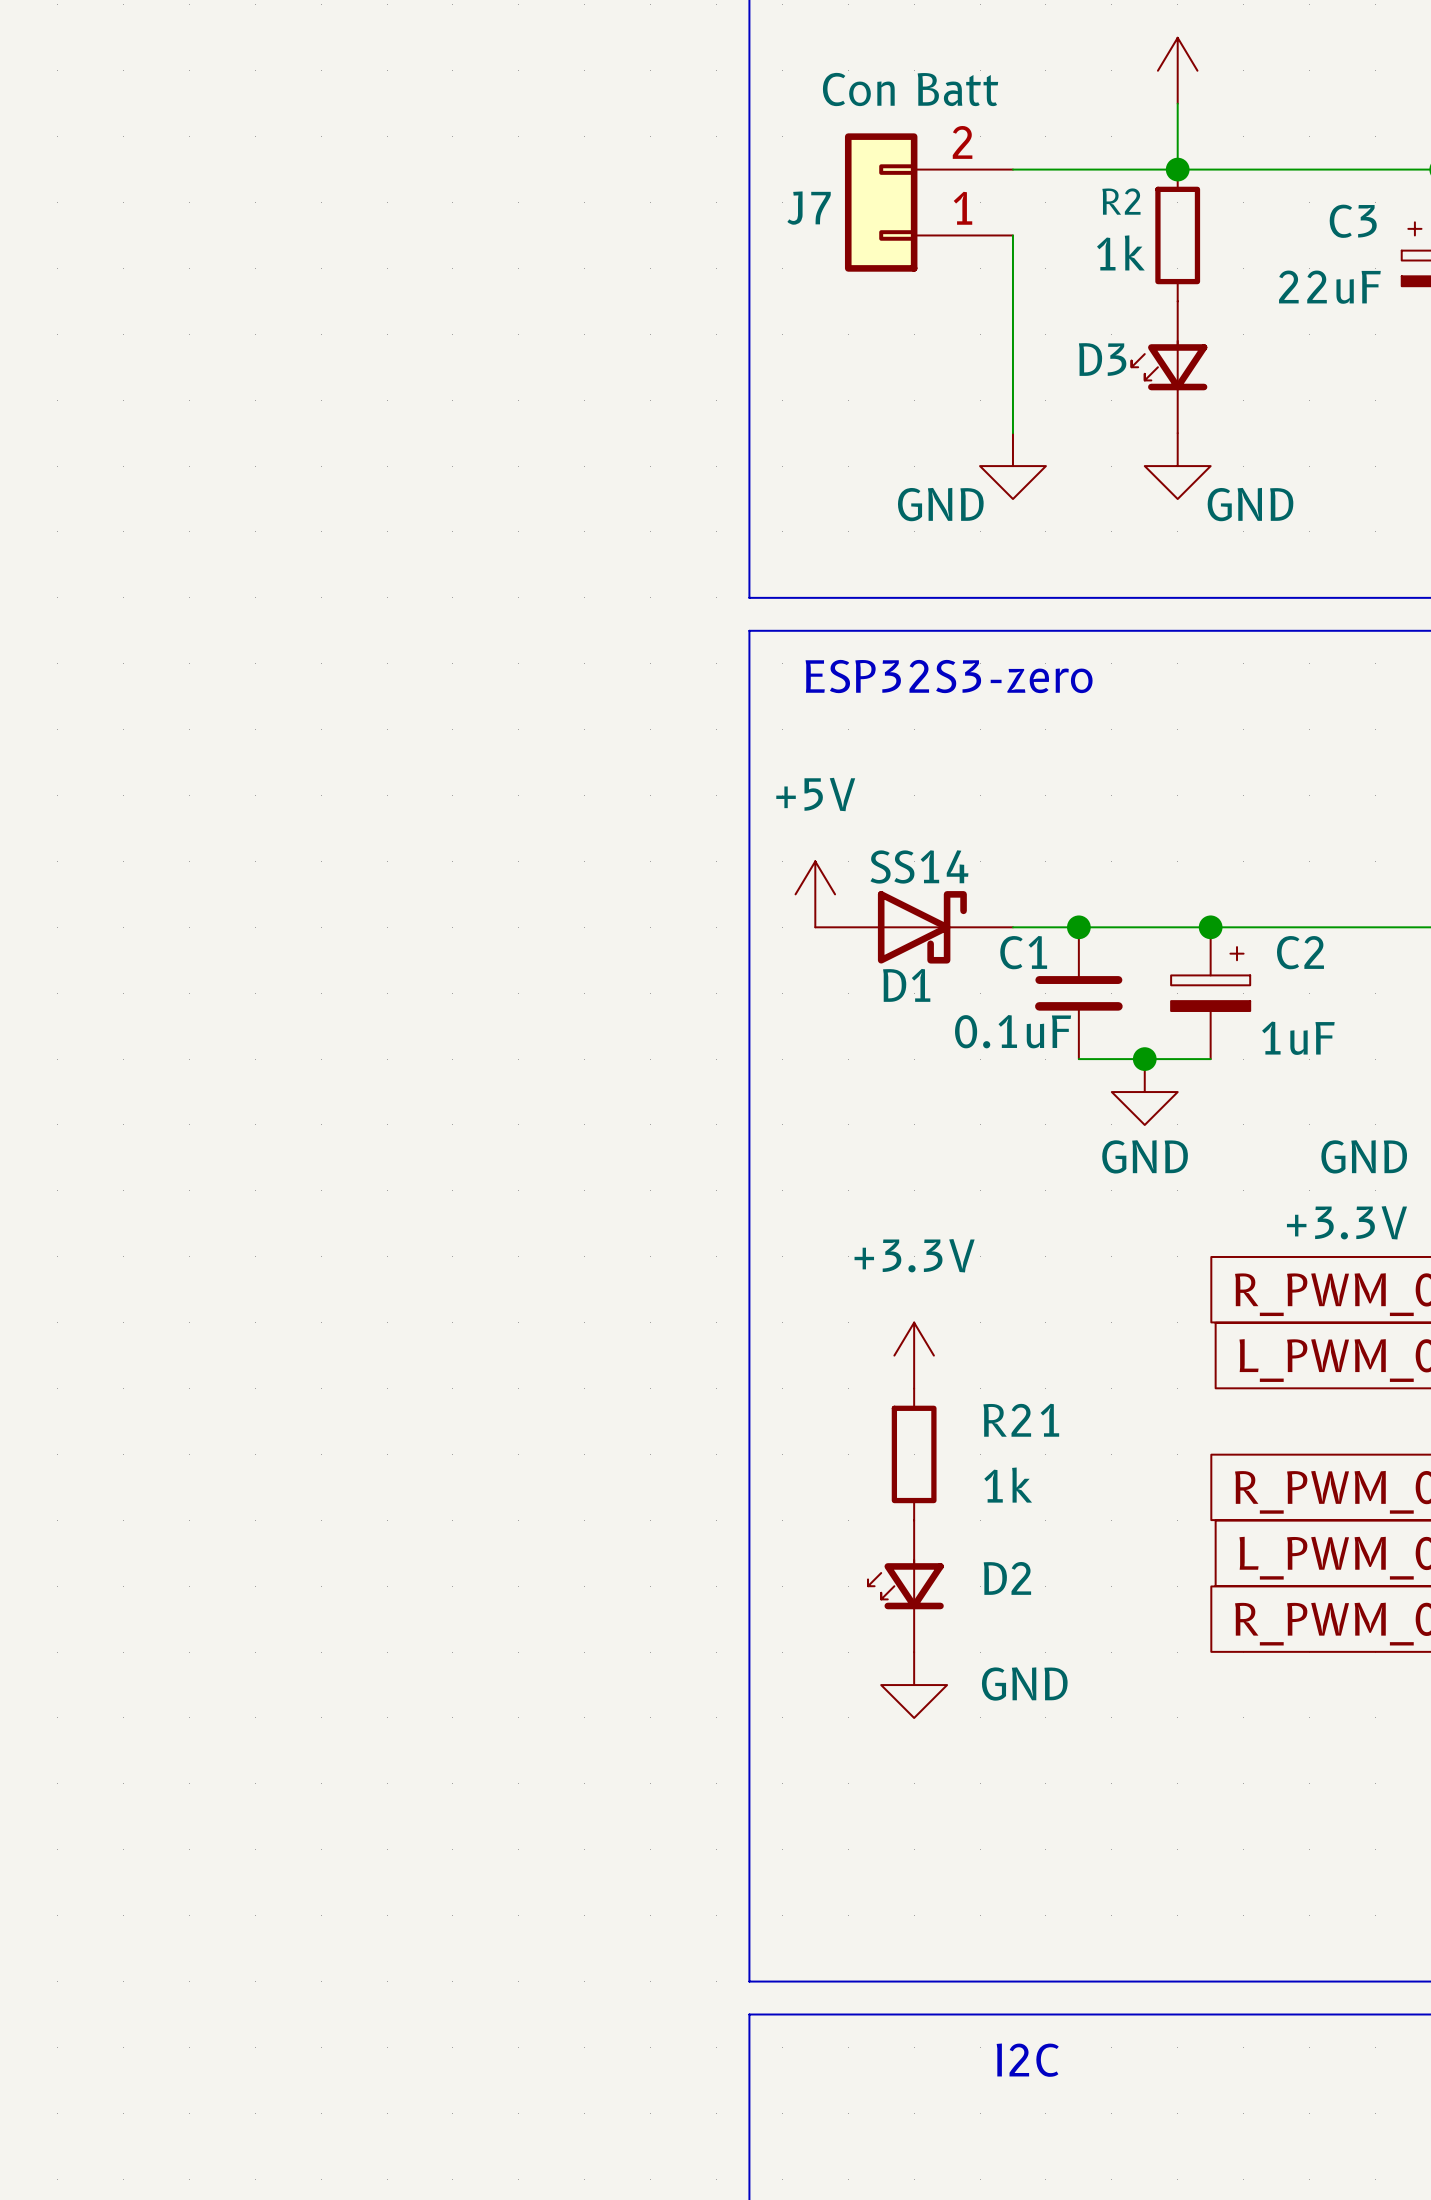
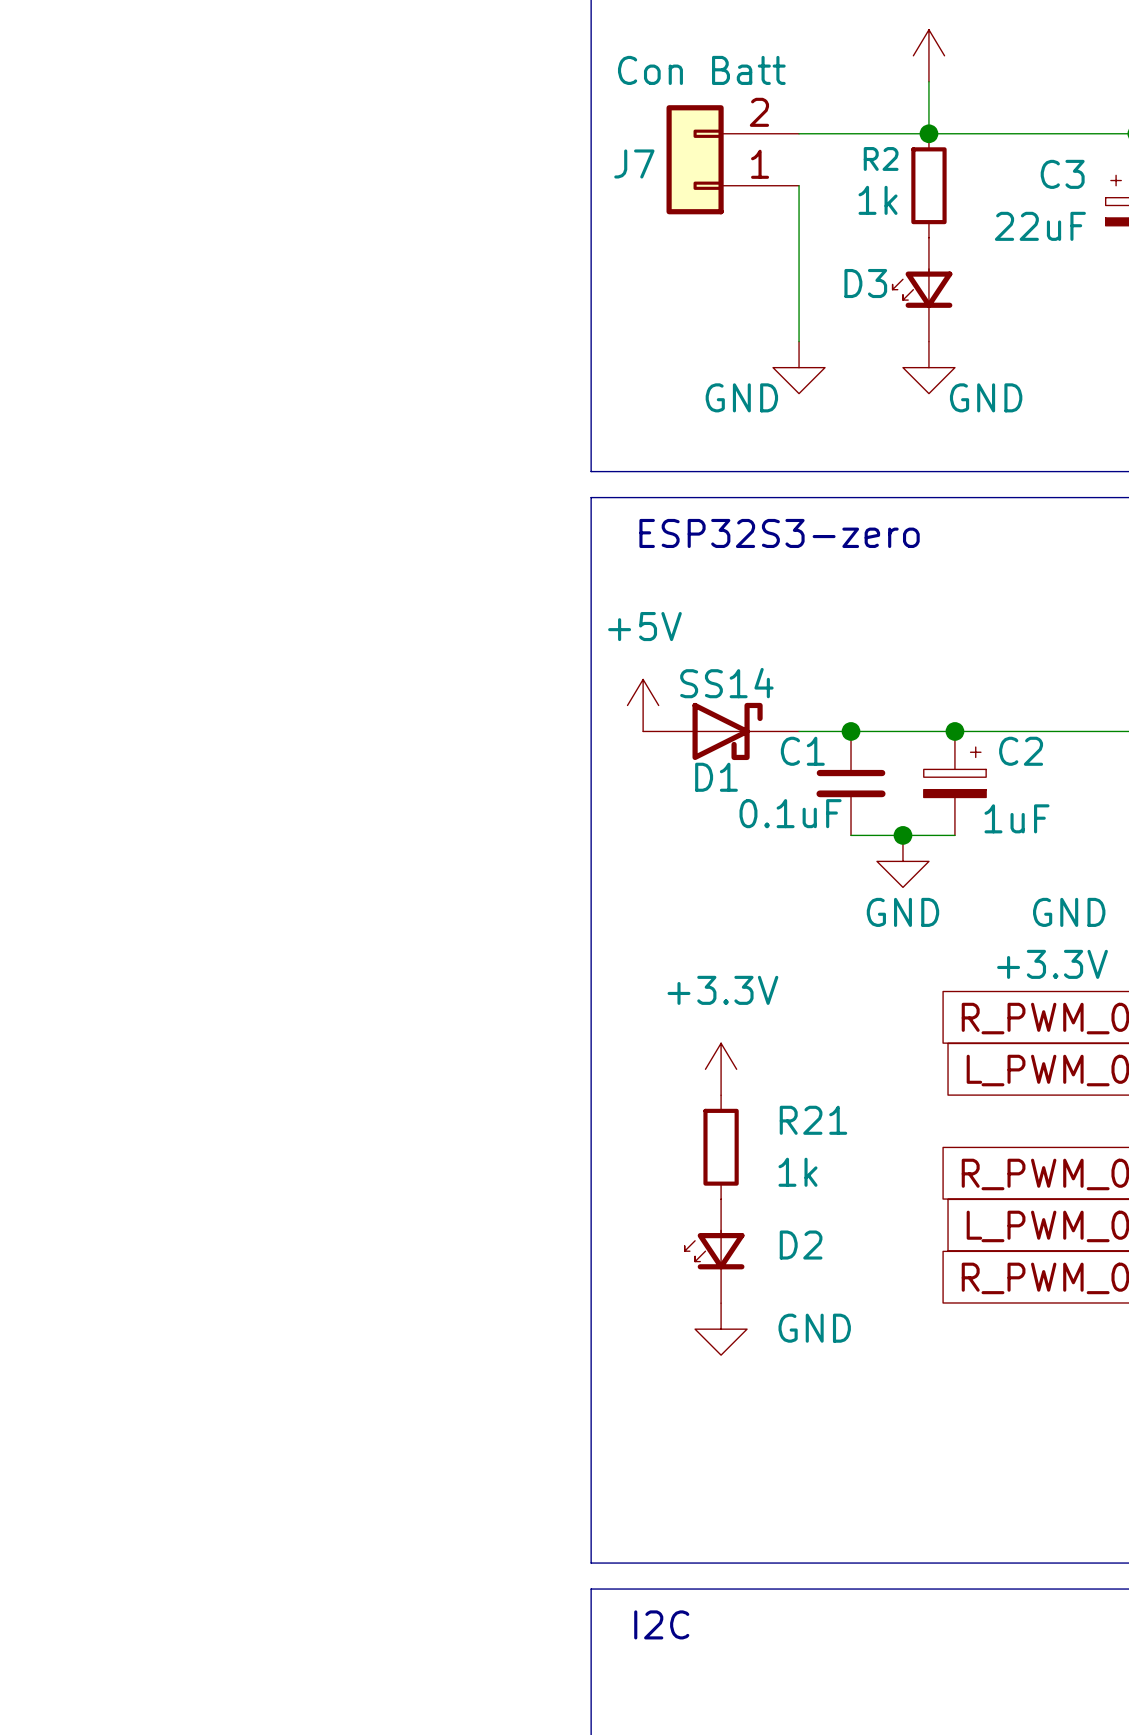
text position: I2C (1027, 2060) -> I2C (661, 1624)

